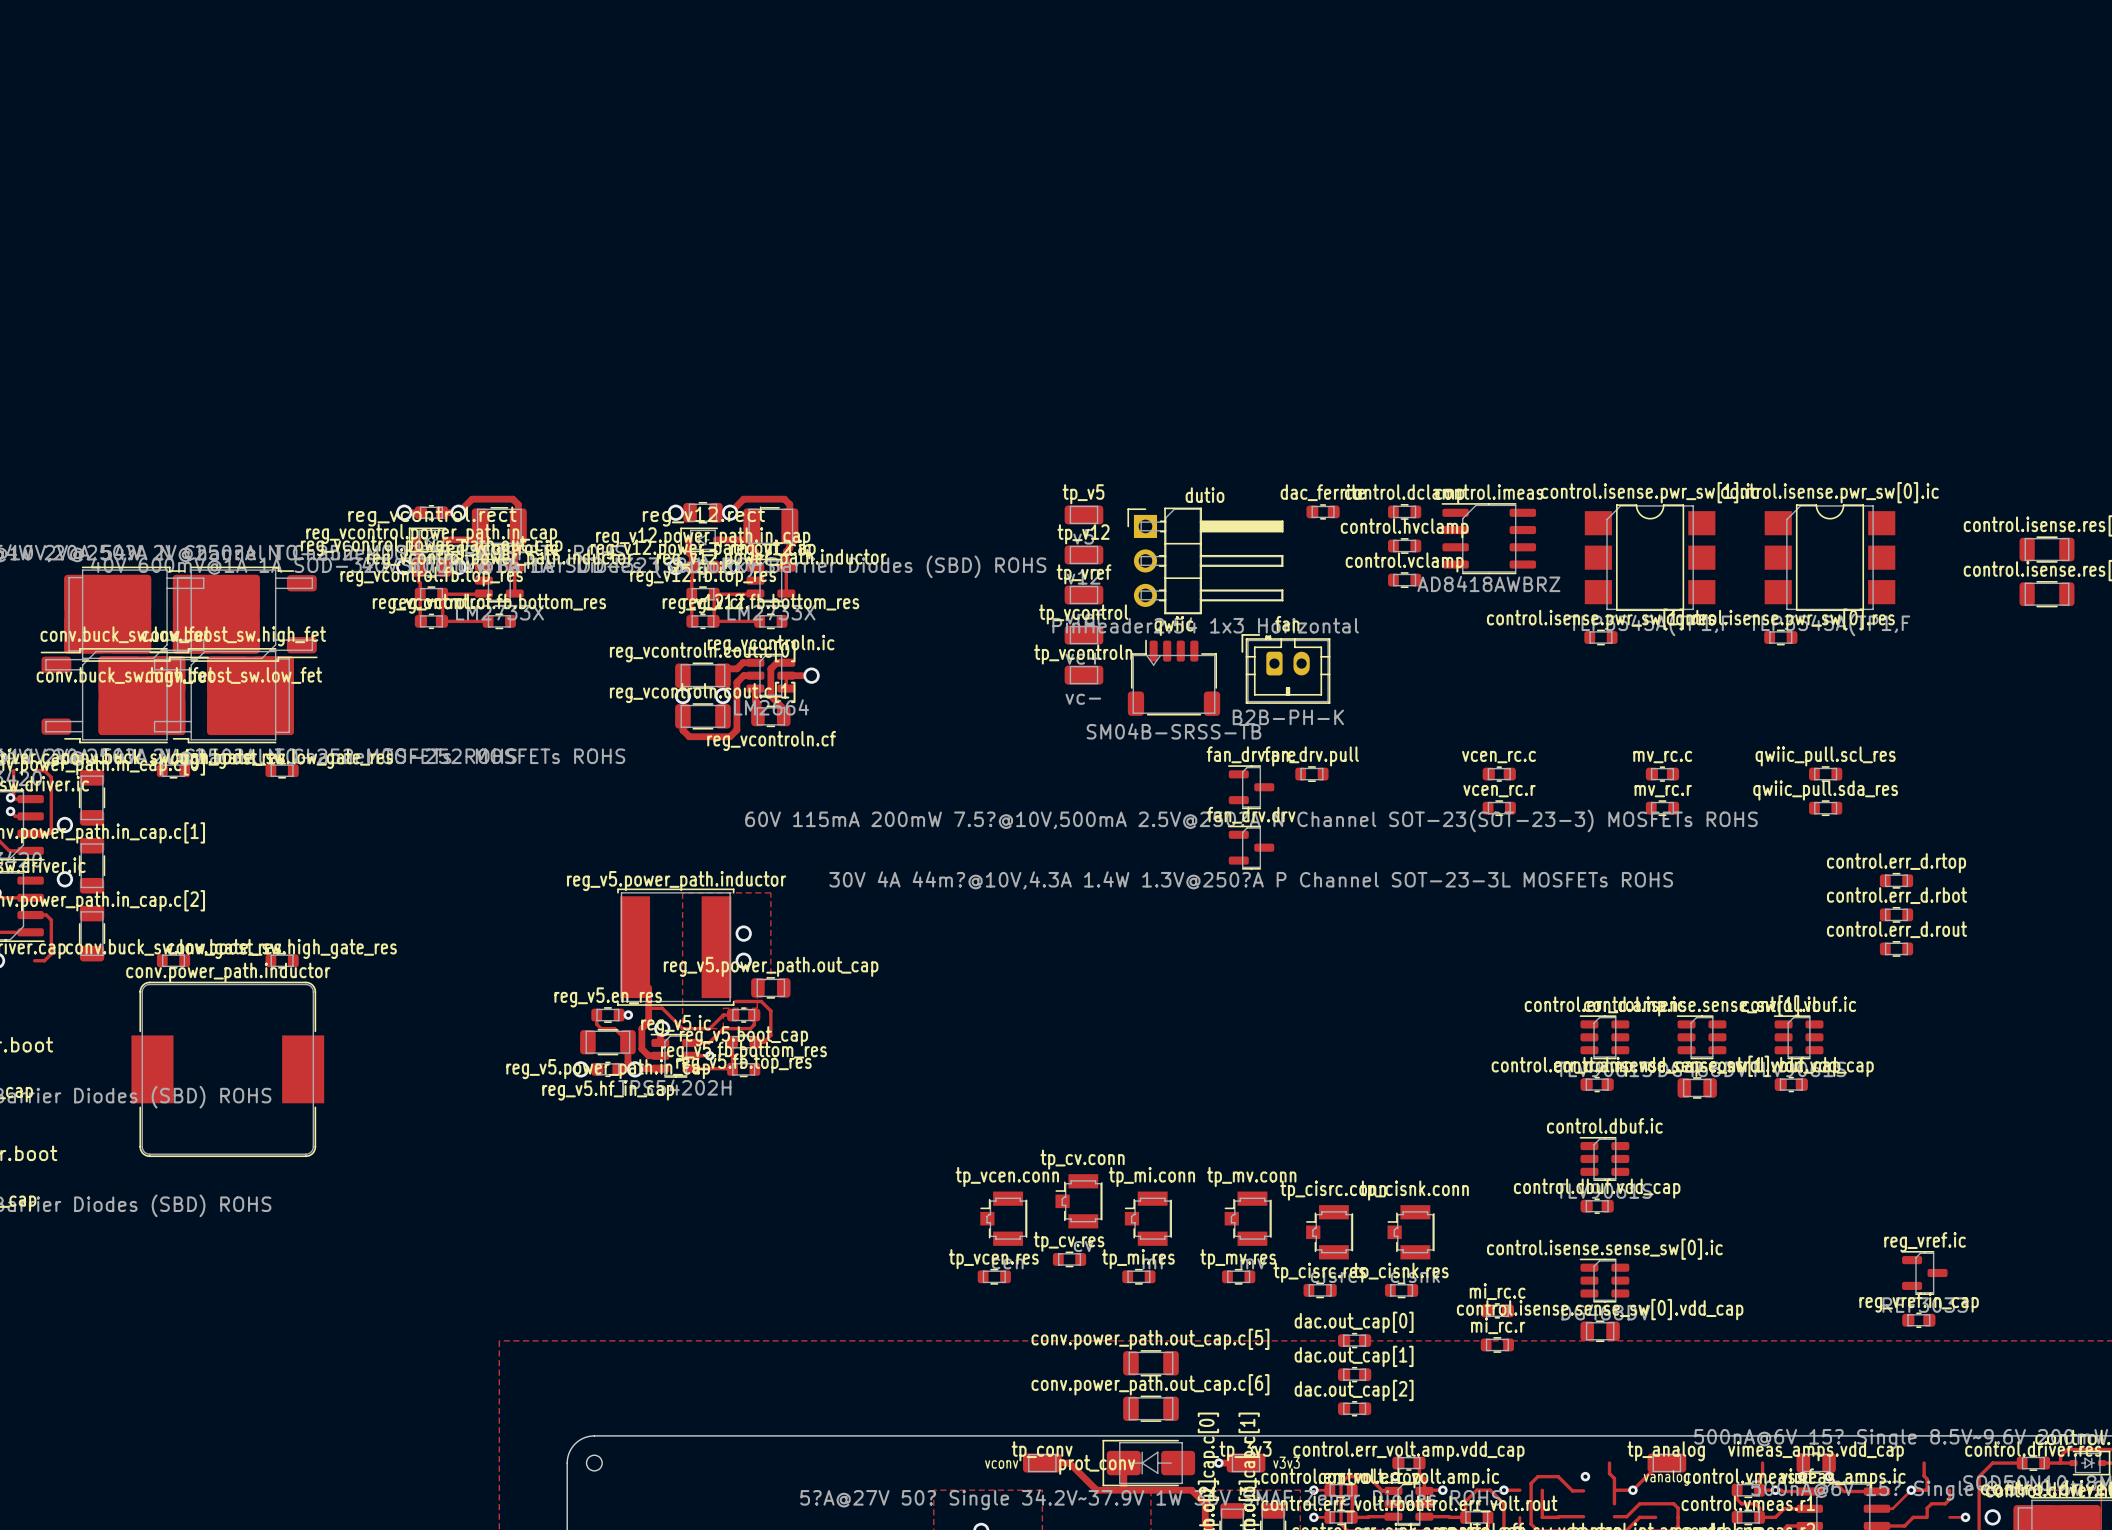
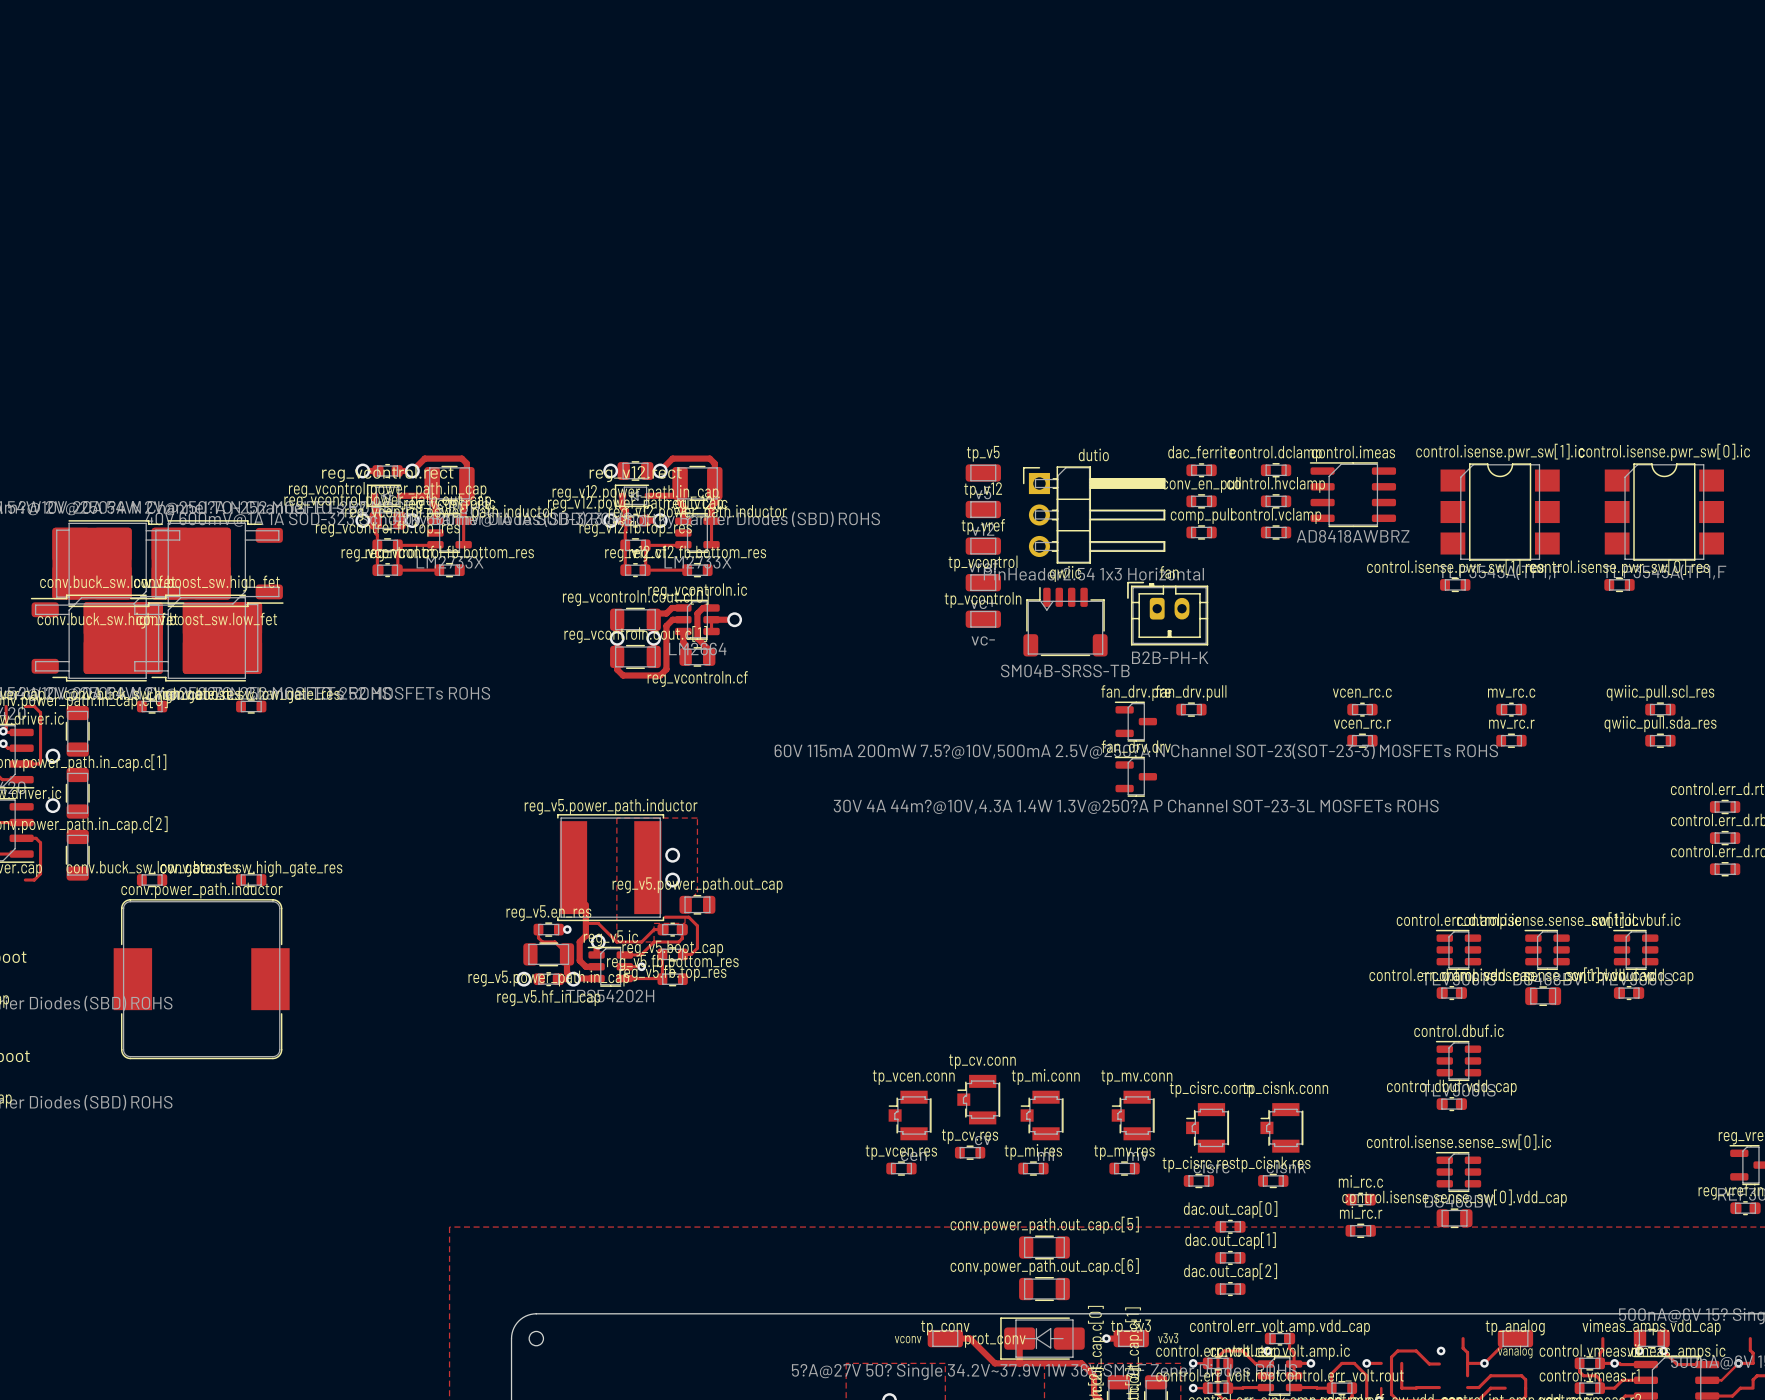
conv_en_pull: none -> (1201, 501)
comp_pull: none -> (1201, 532)

